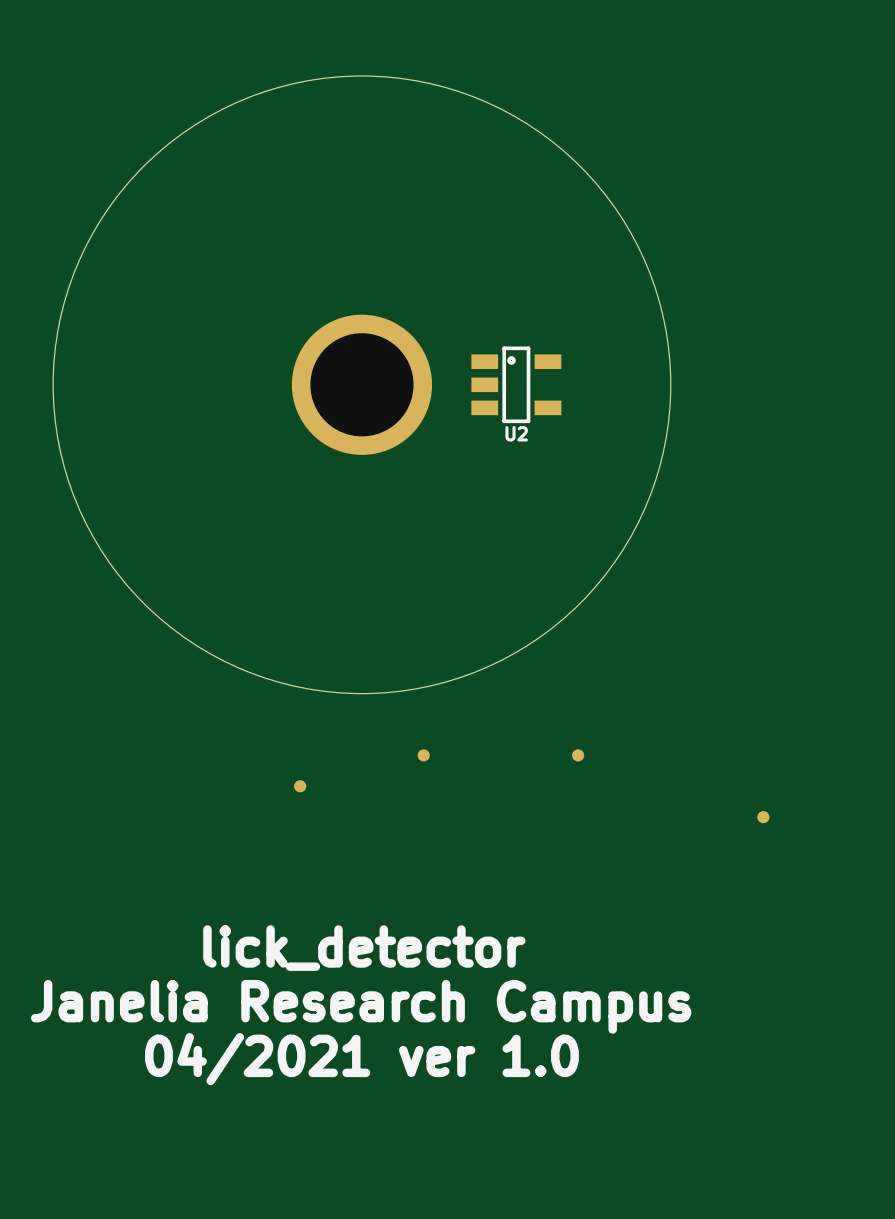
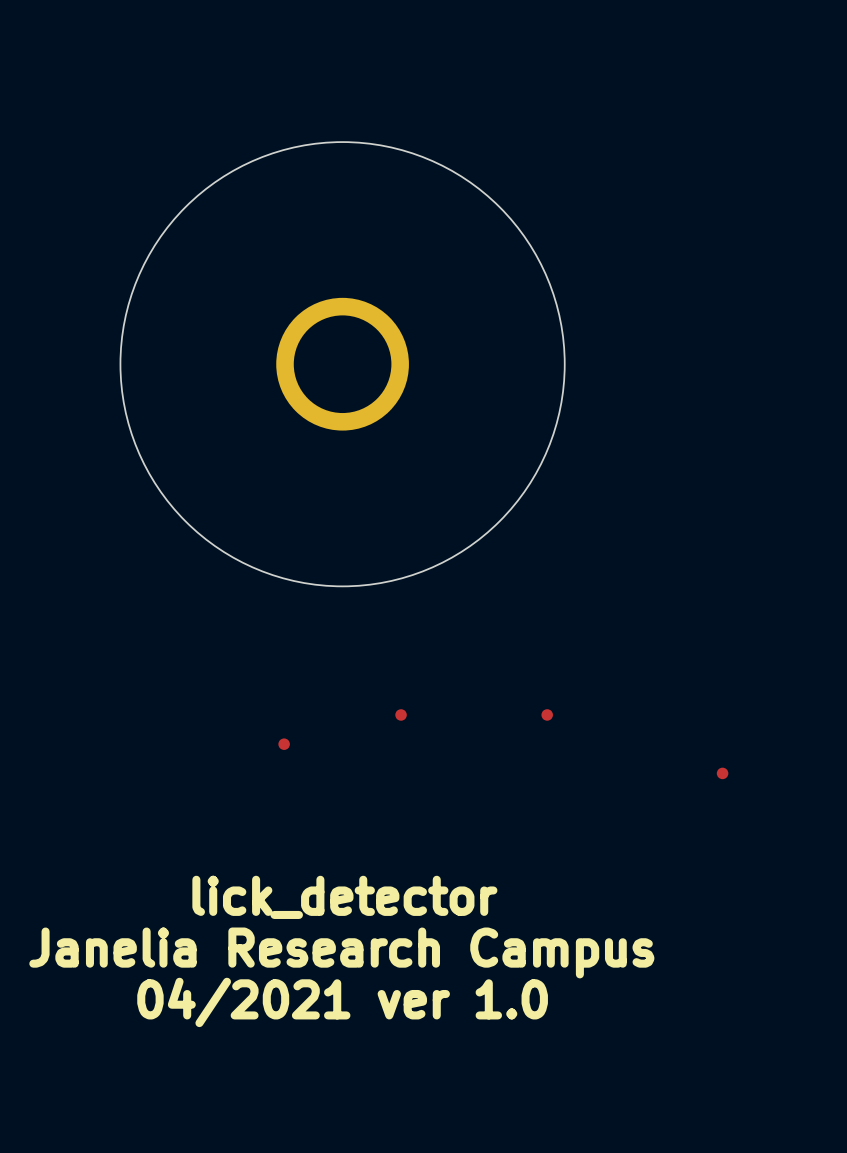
round board edge size: [52, 75, 672, 695] -> [119, 141, 566, 588]
U2: (516, 384) -> none

